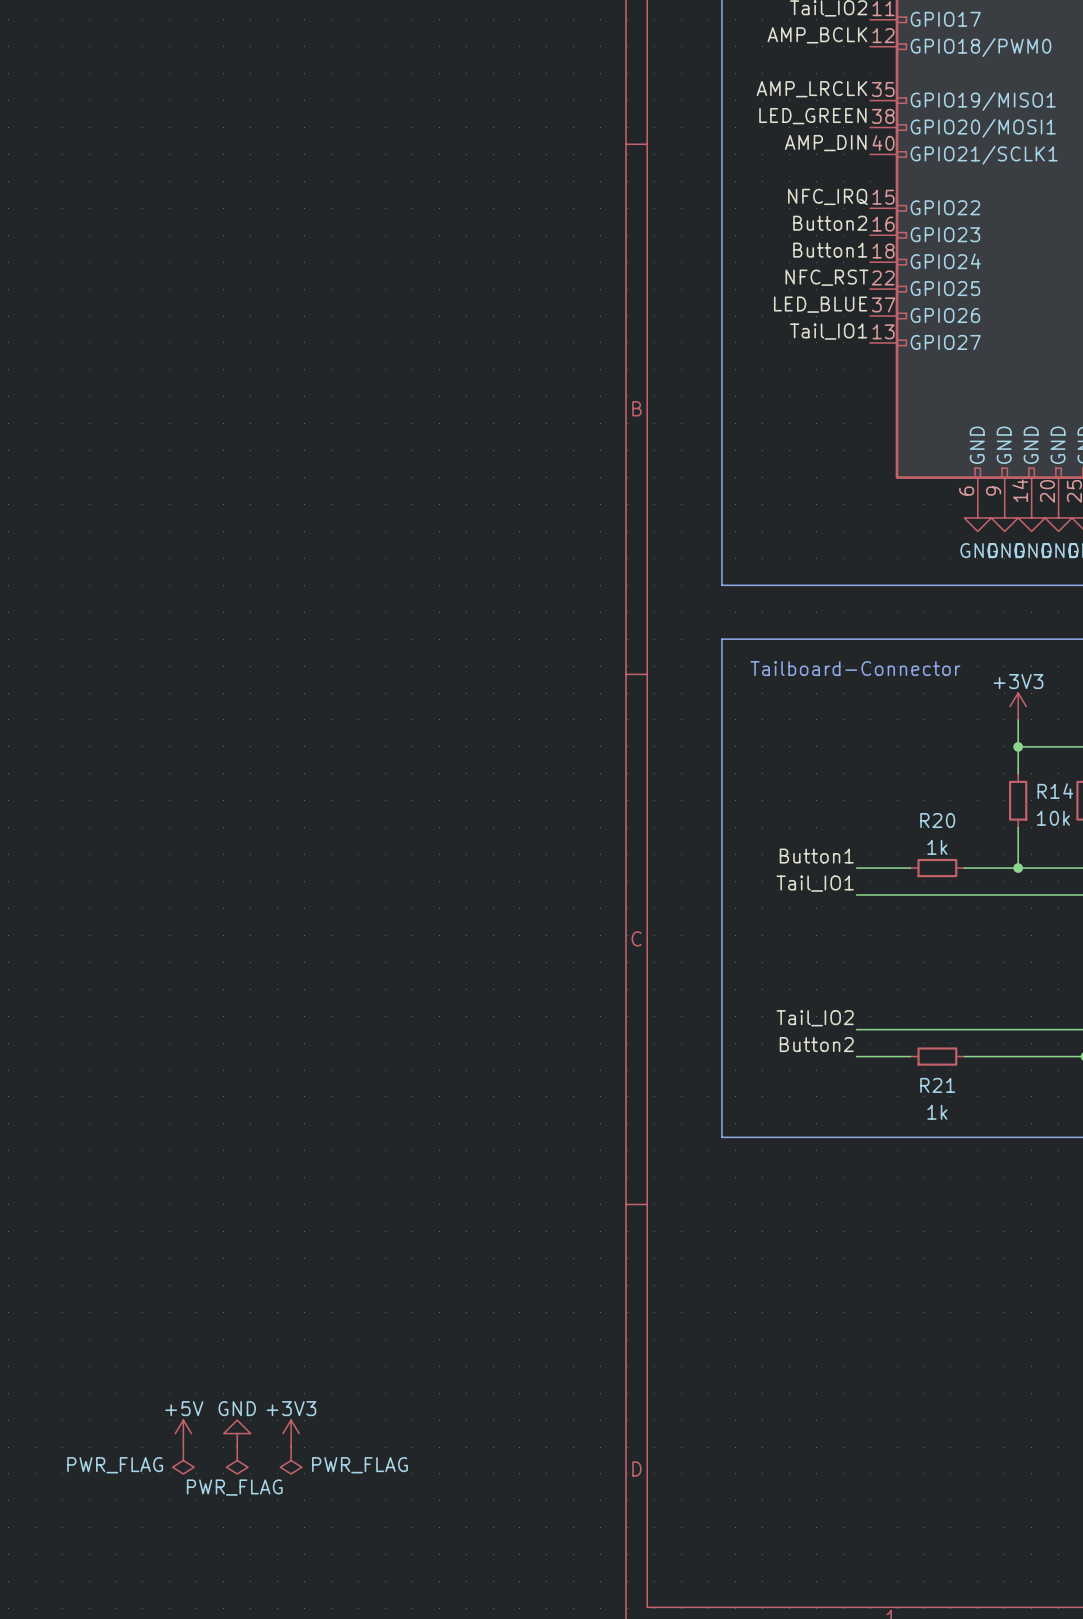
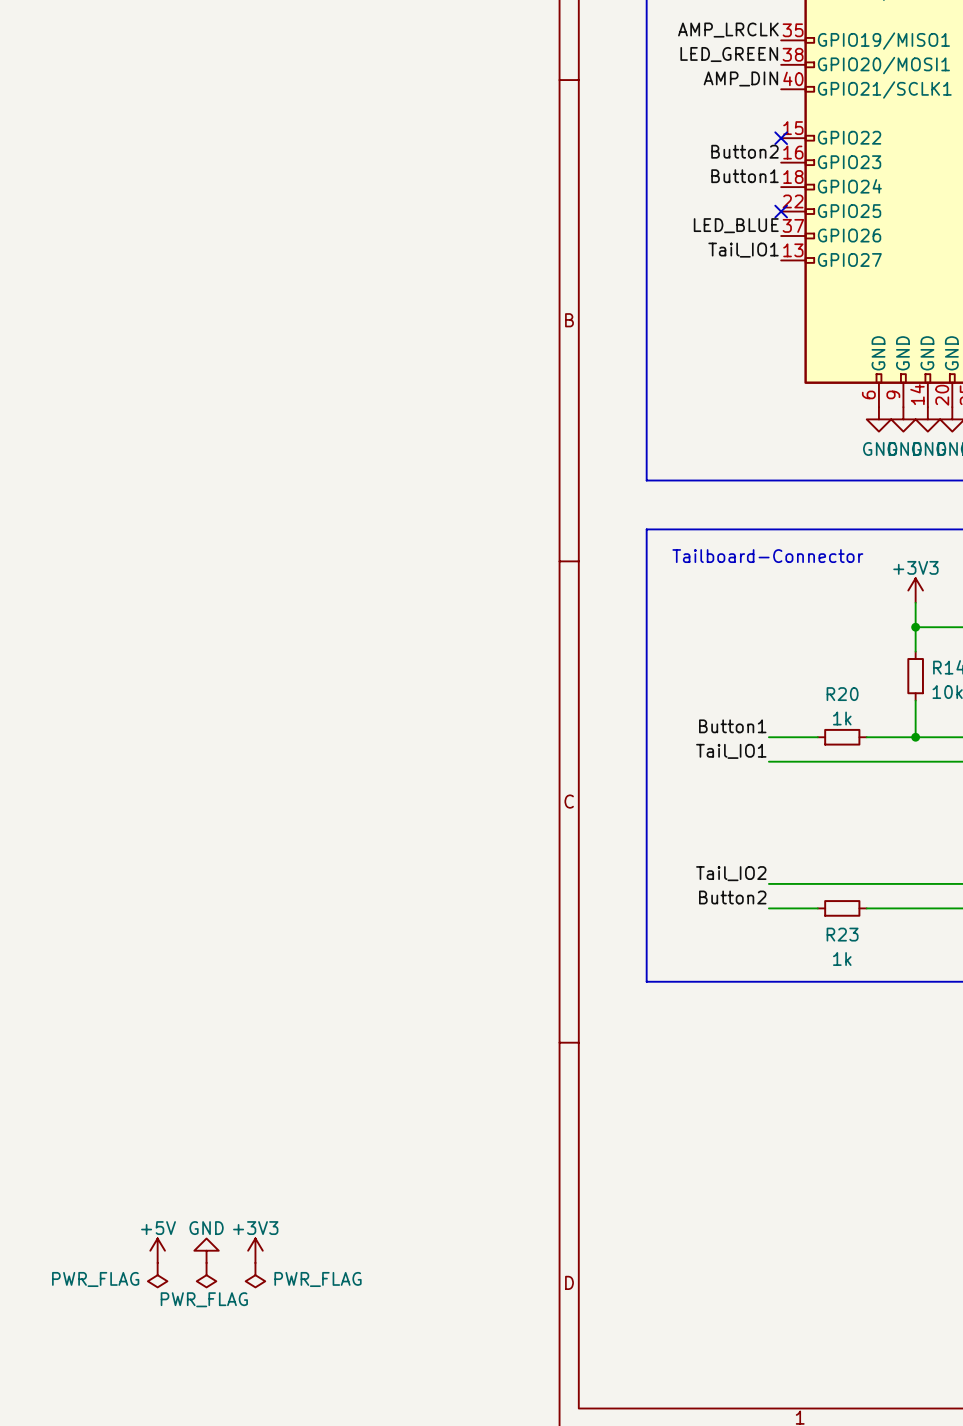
label: NFC_IRQ (827, 196) -> none
no-connect mark: none -> (781, 138)
label: NFC_RST (827, 277) -> none
no-connect mark: none -> (781, 211)
R21 name: R21 (937, 1085) -> R23 (842, 934)

